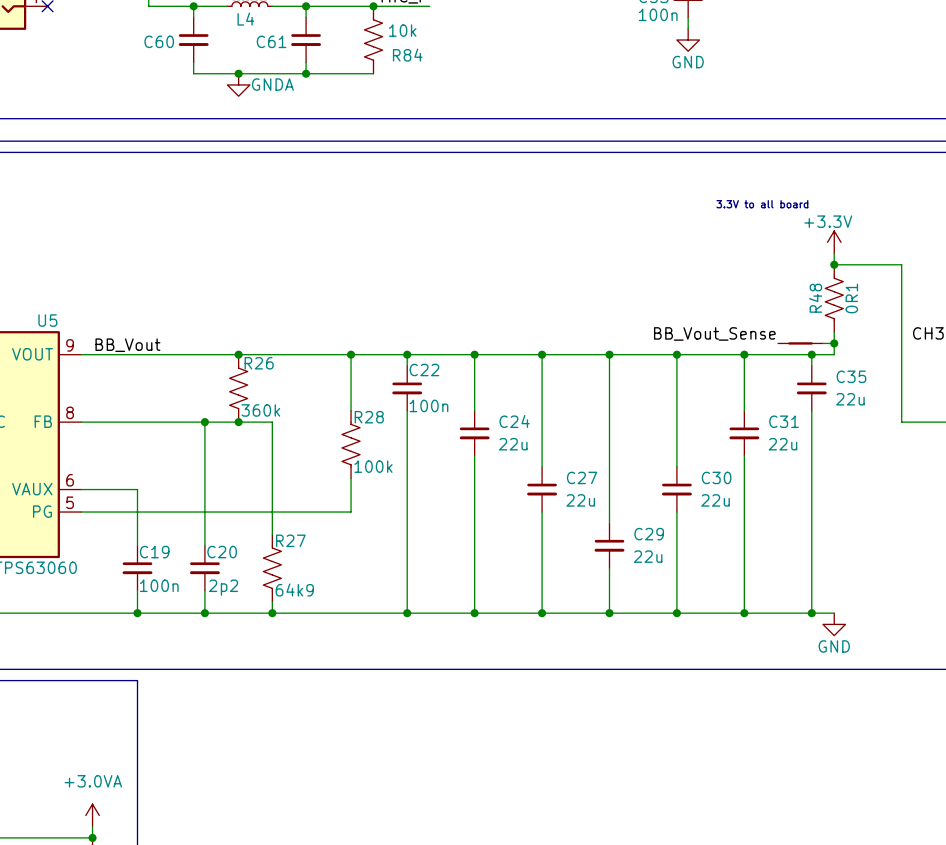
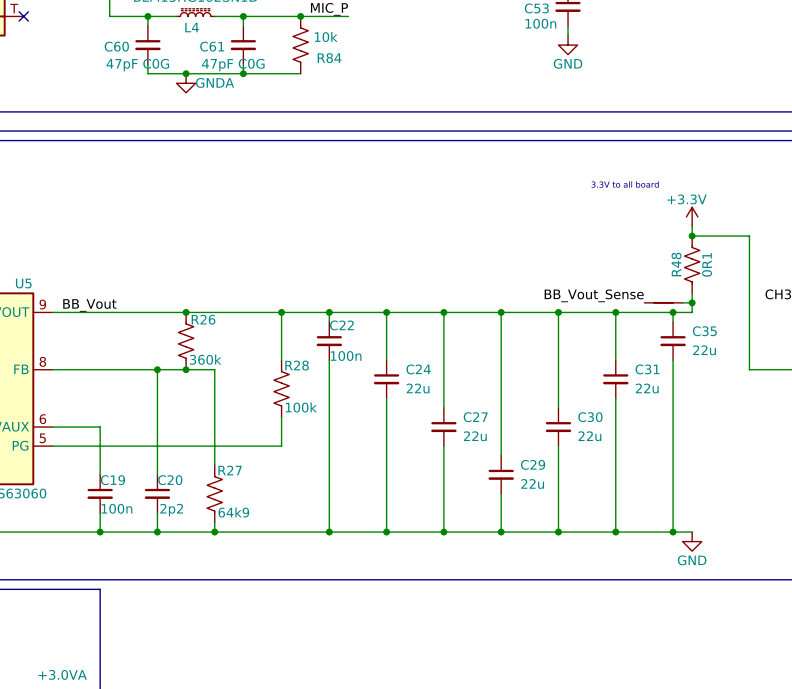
C60 value: none -> 47pF C0G (137, 65)
C61 value: none -> 47pF C0G (233, 65)

